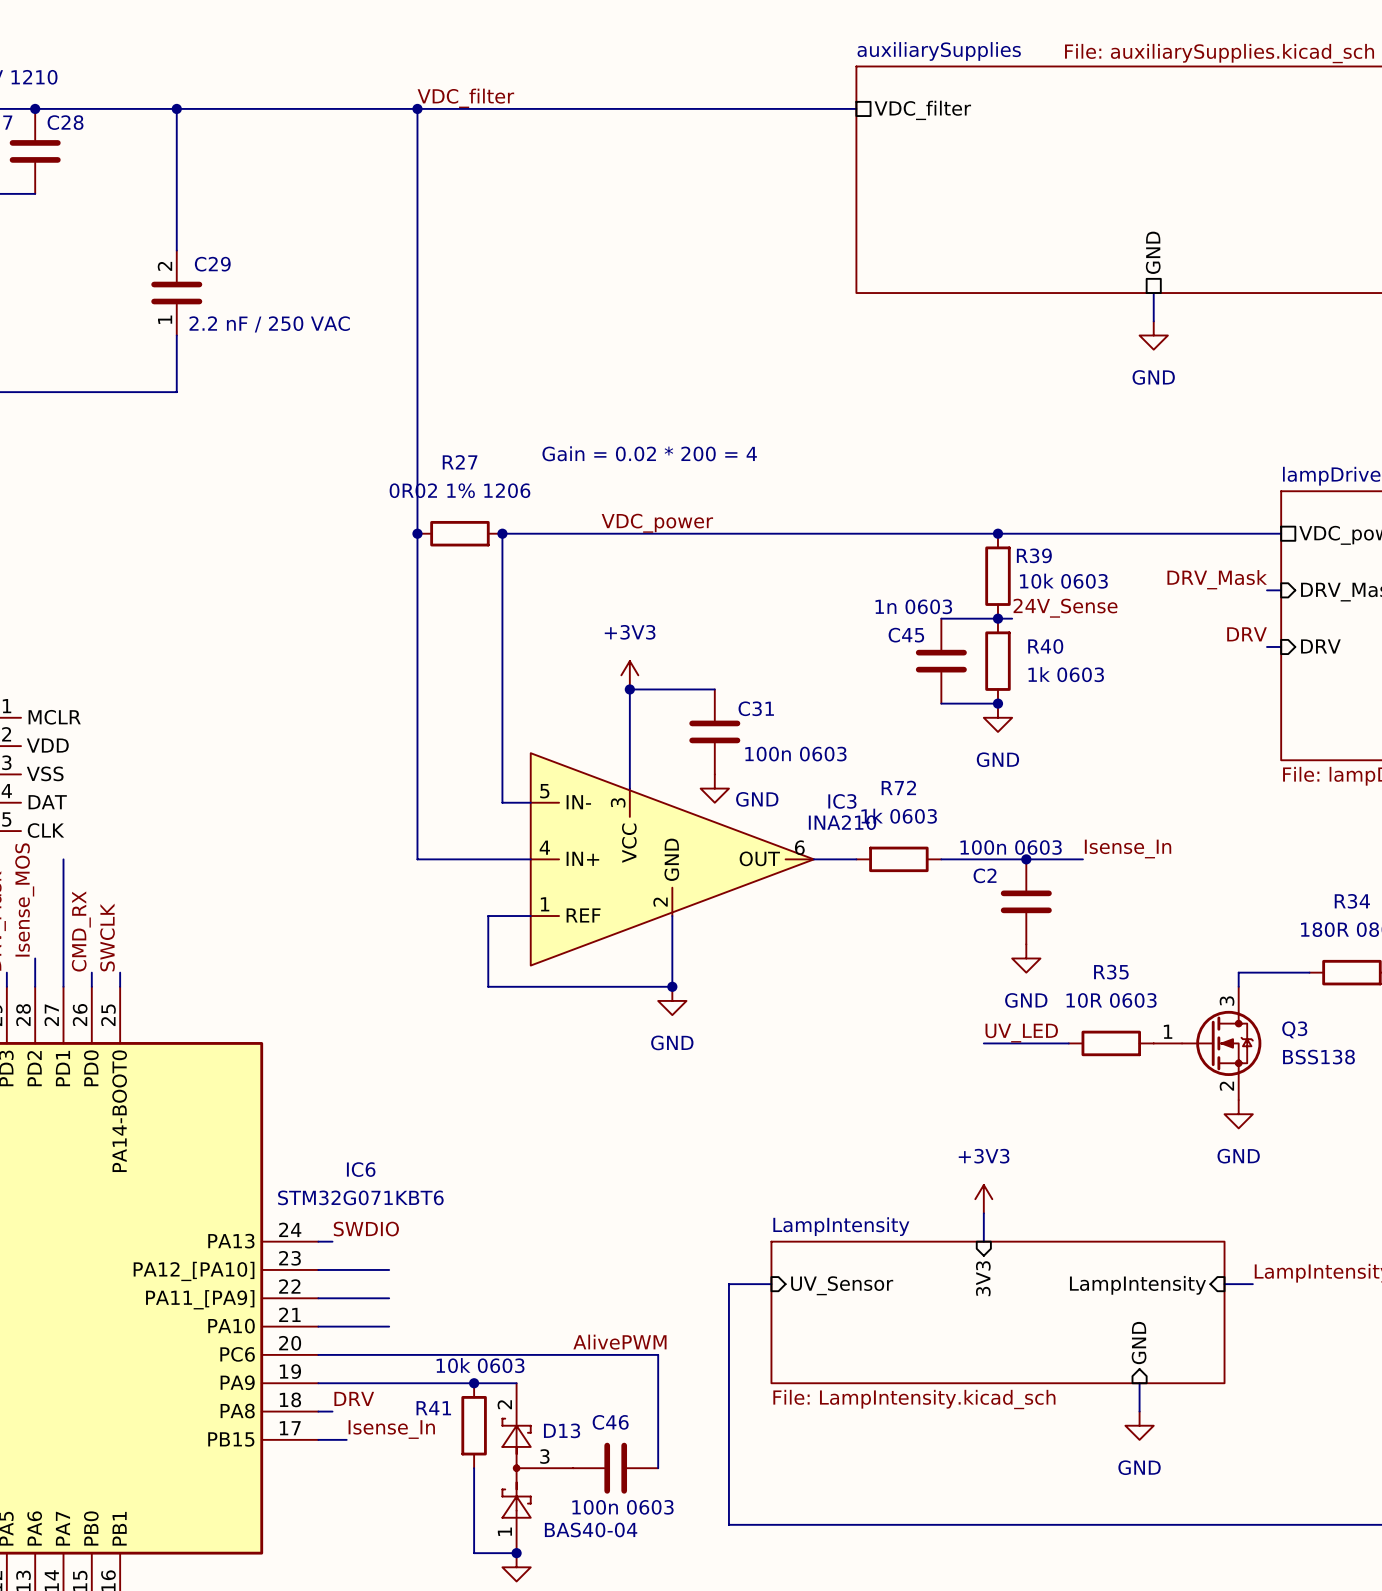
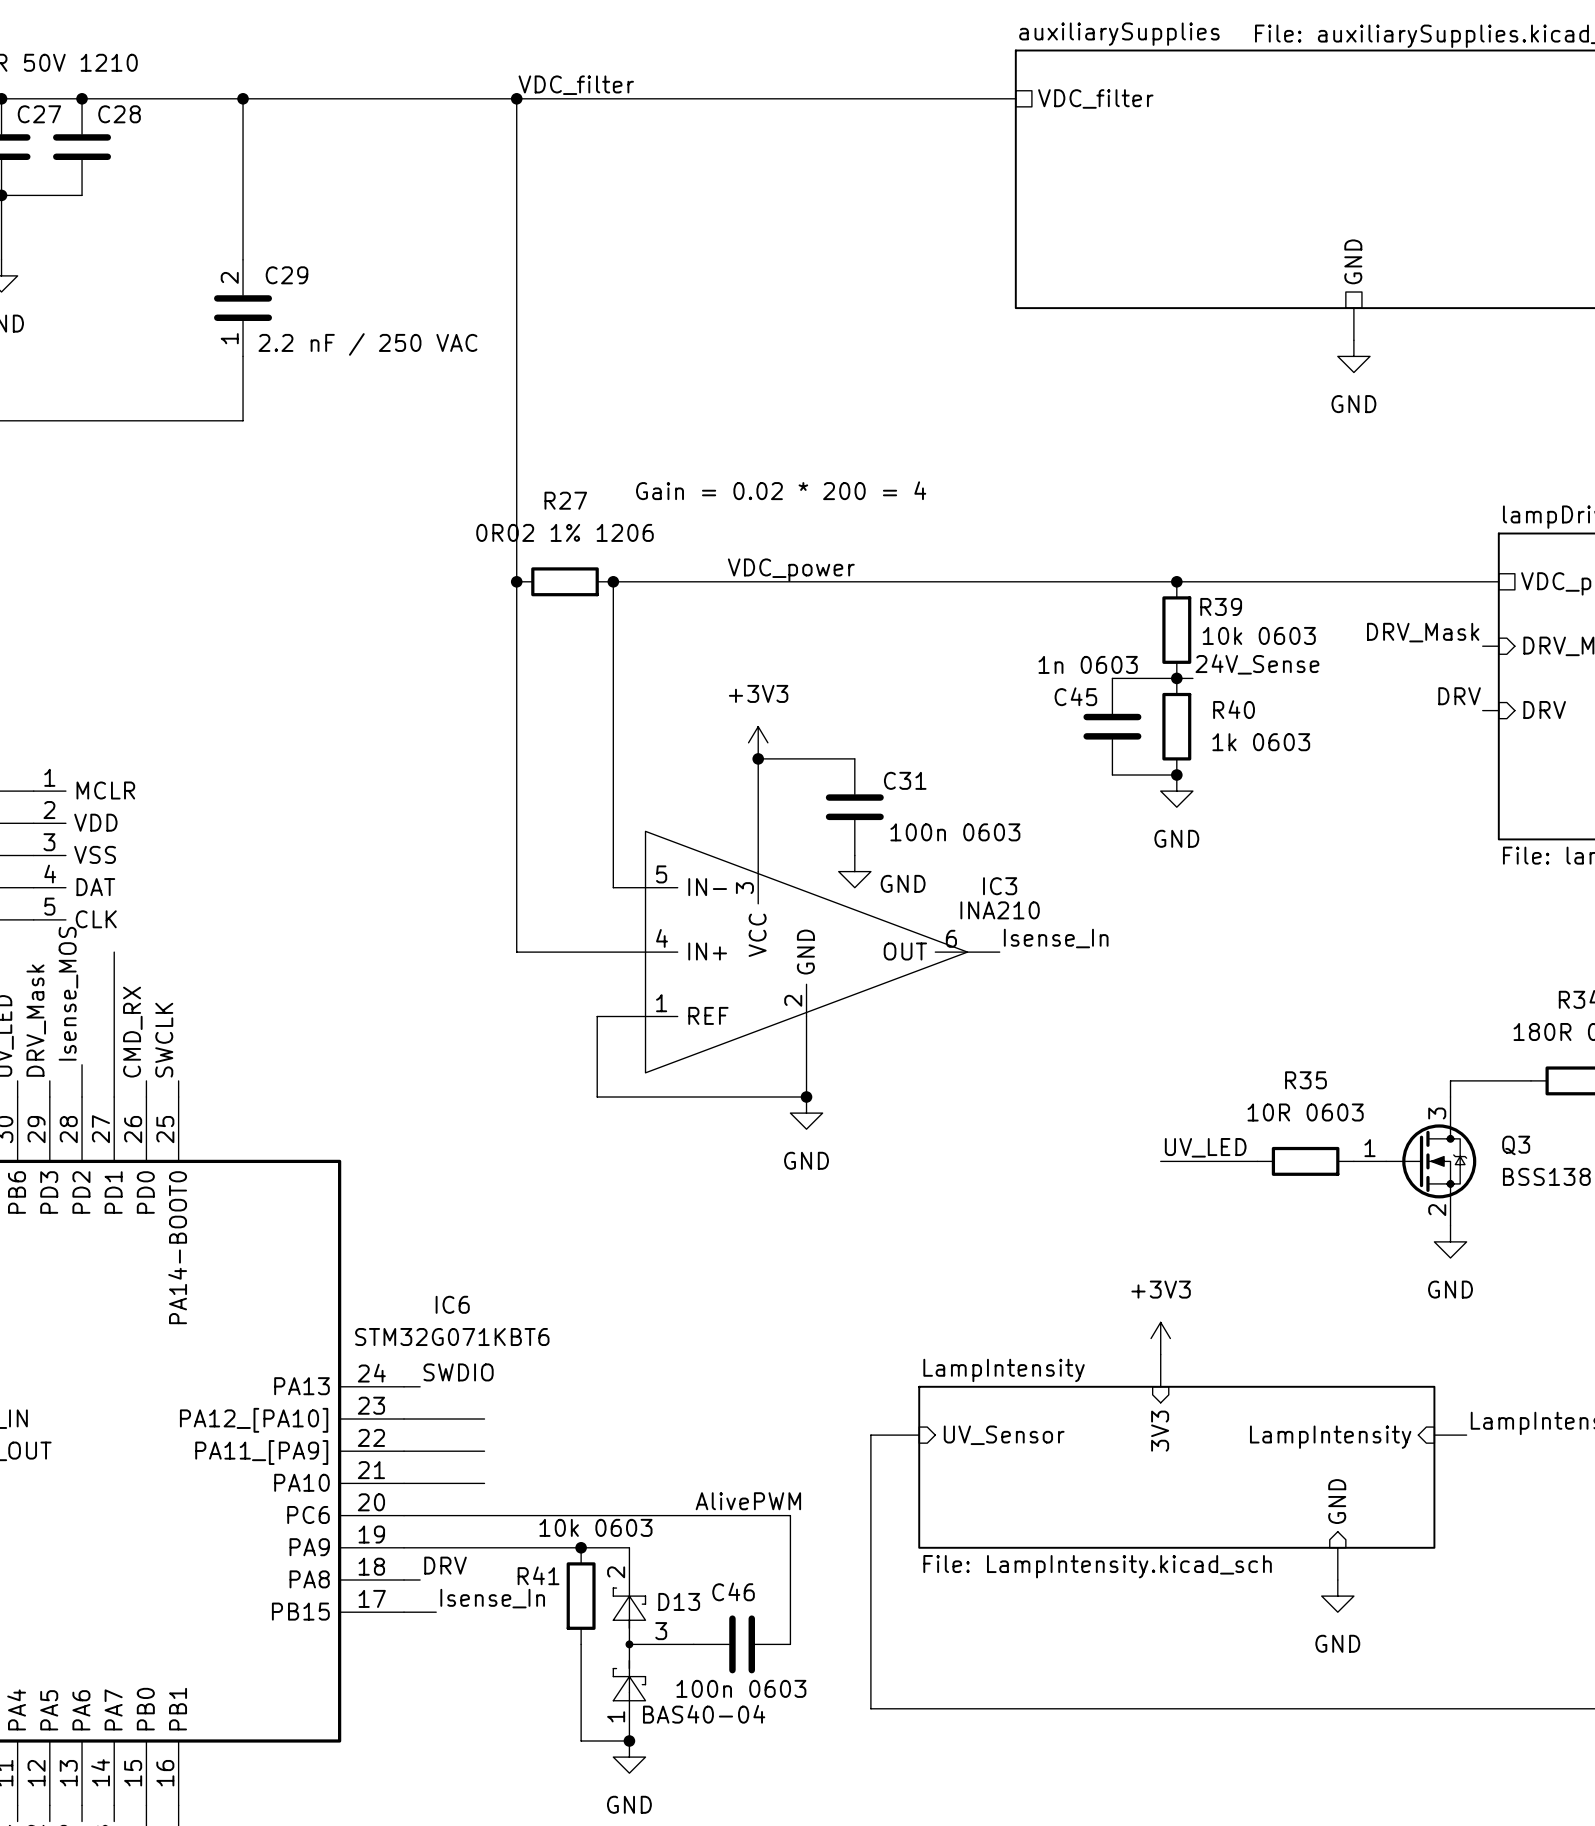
label position: Isense_In (1128, 849) -> Isense_In (1056, 938)
wire: (842, 859) (856, 859) -> none
R72: 1k 0603 (898, 859) -> none
wire: (941, 859) (1082, 859) -> none
junction: (1026, 859) -> none
C2: 100n 0603 (1026, 901) -> none
power symbol: GND (1026, 958) -> none

